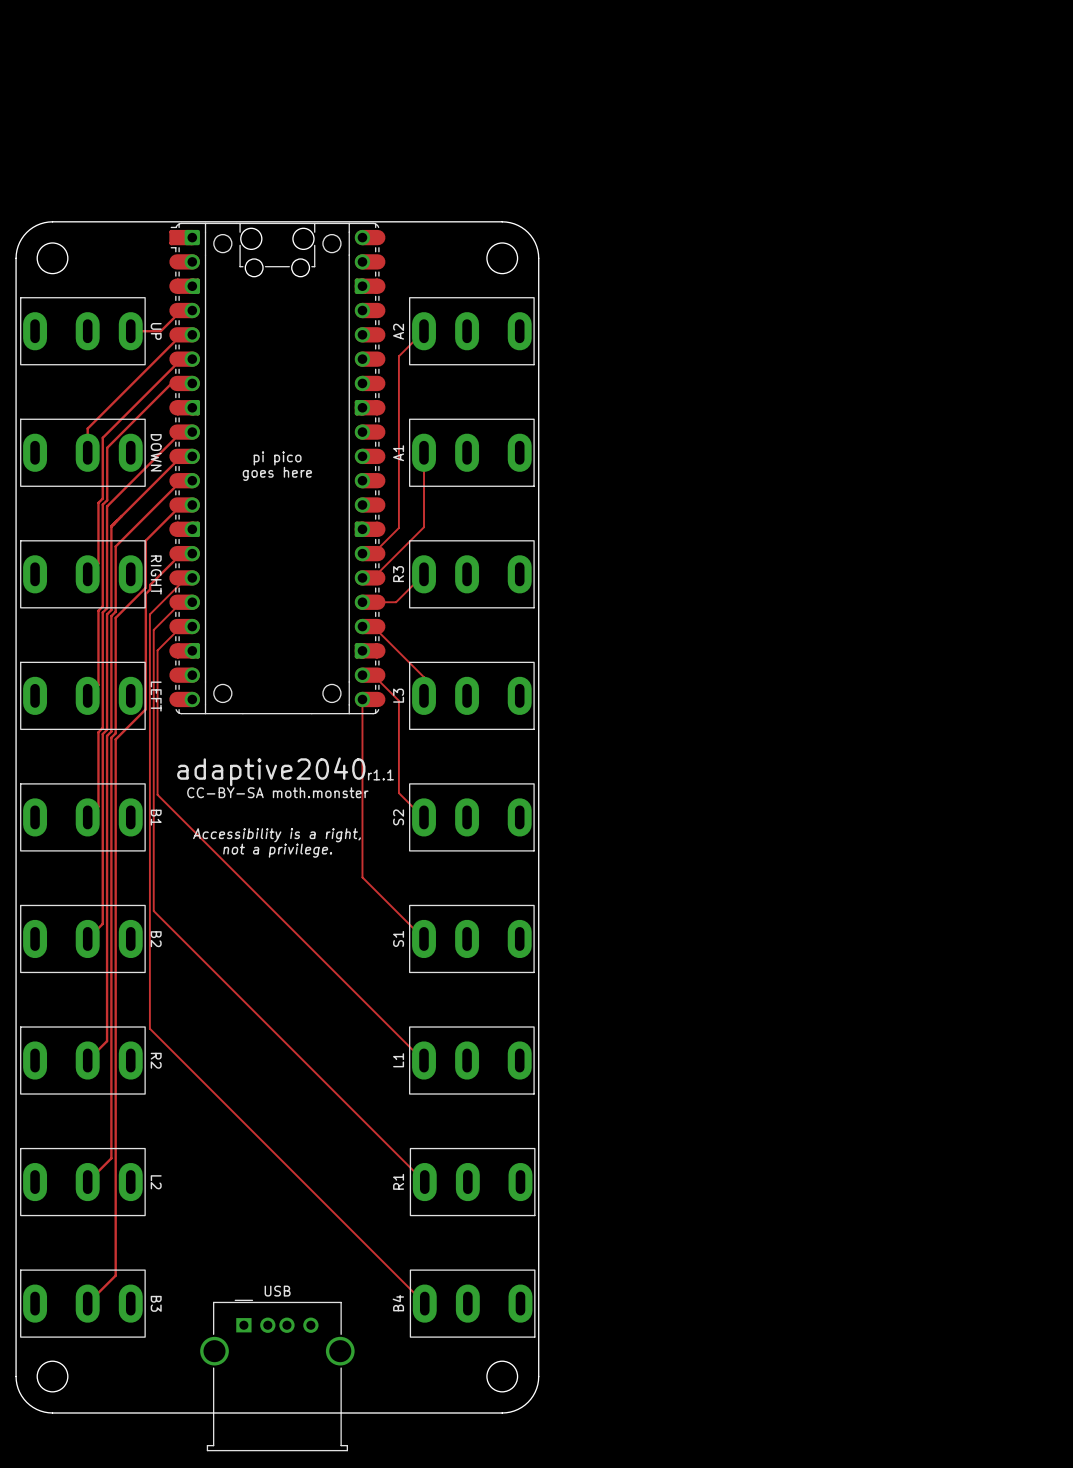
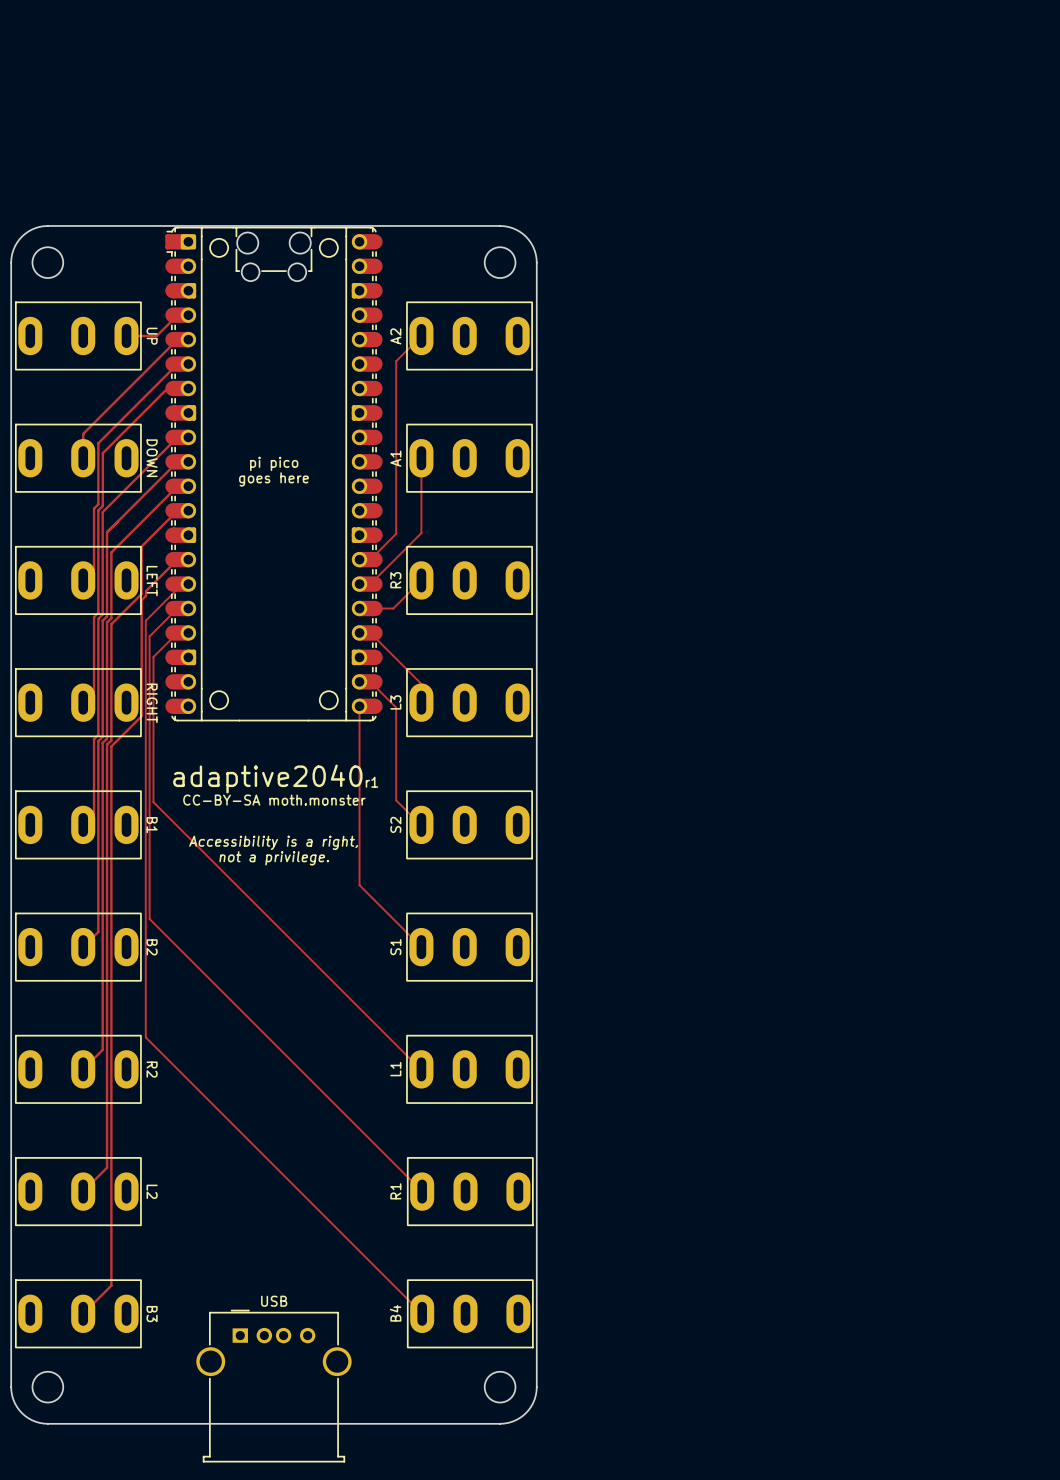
text: RIGHT (156, 575) -> LEFT (152, 581)
text: LEFT (156, 696) -> RIGHT (152, 703)
text: r1.1 (380, 774) -> r1 (371, 782)

